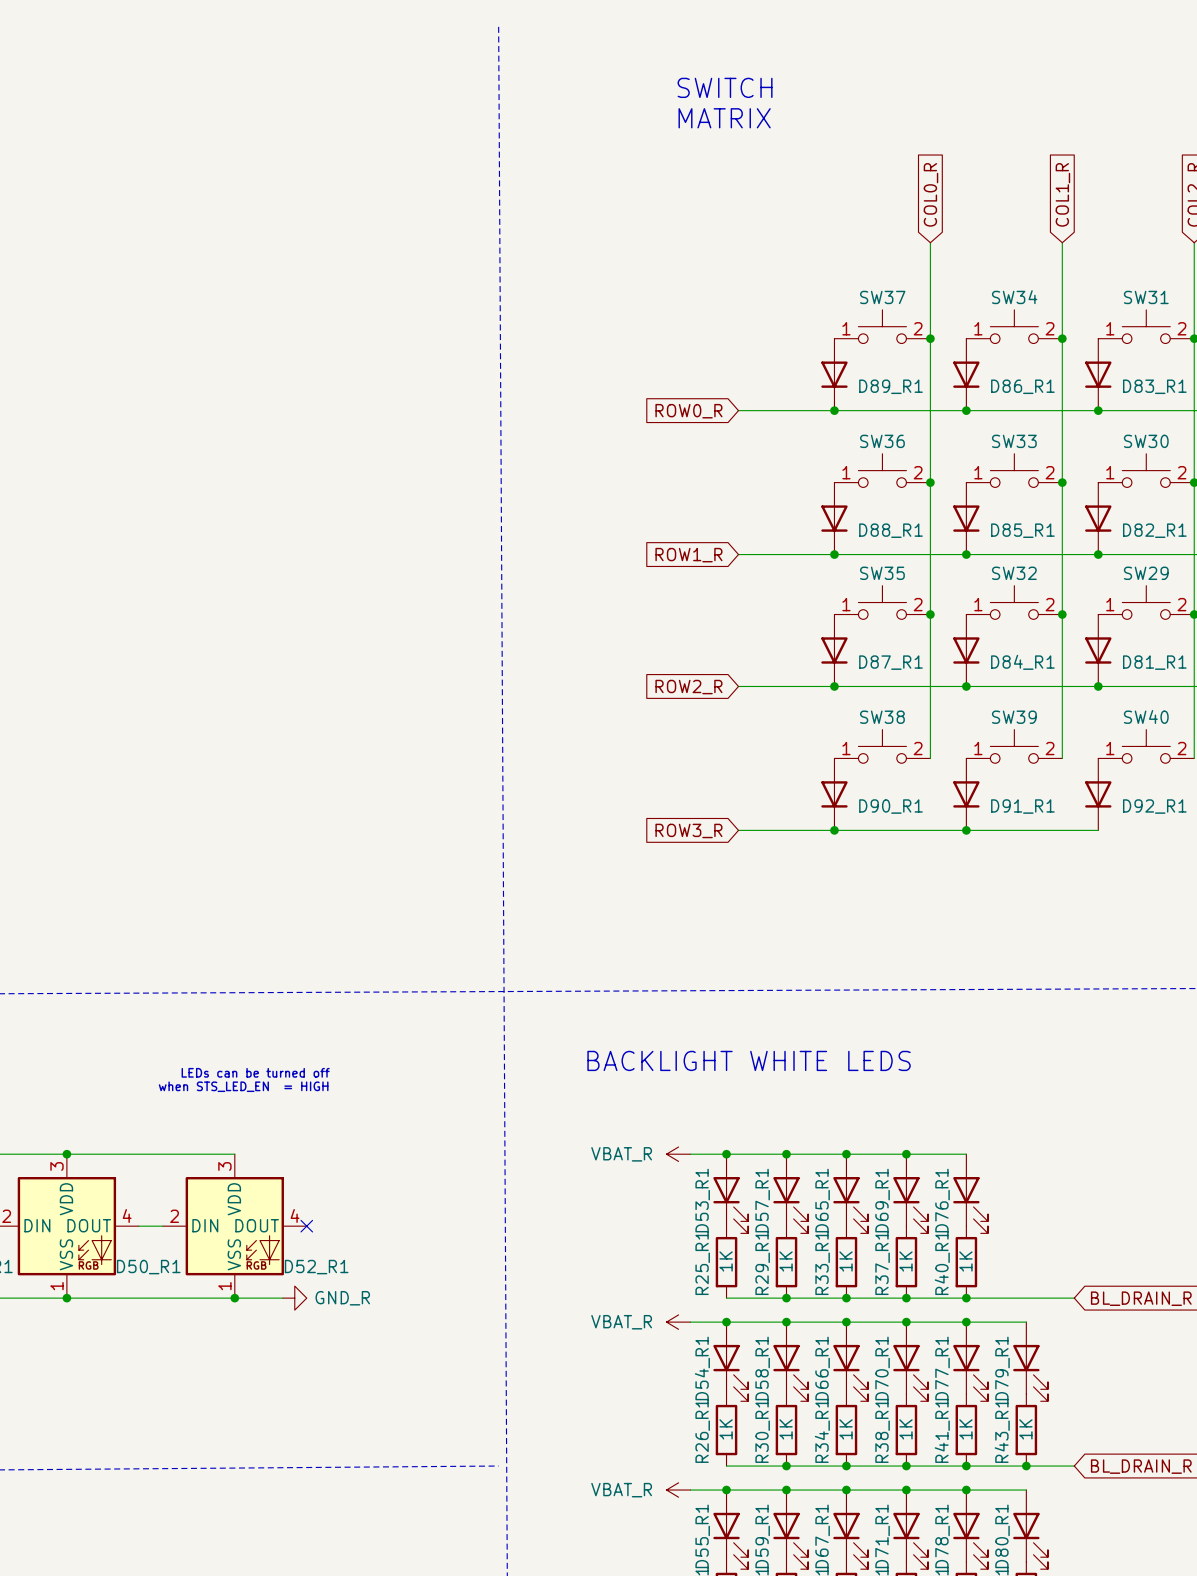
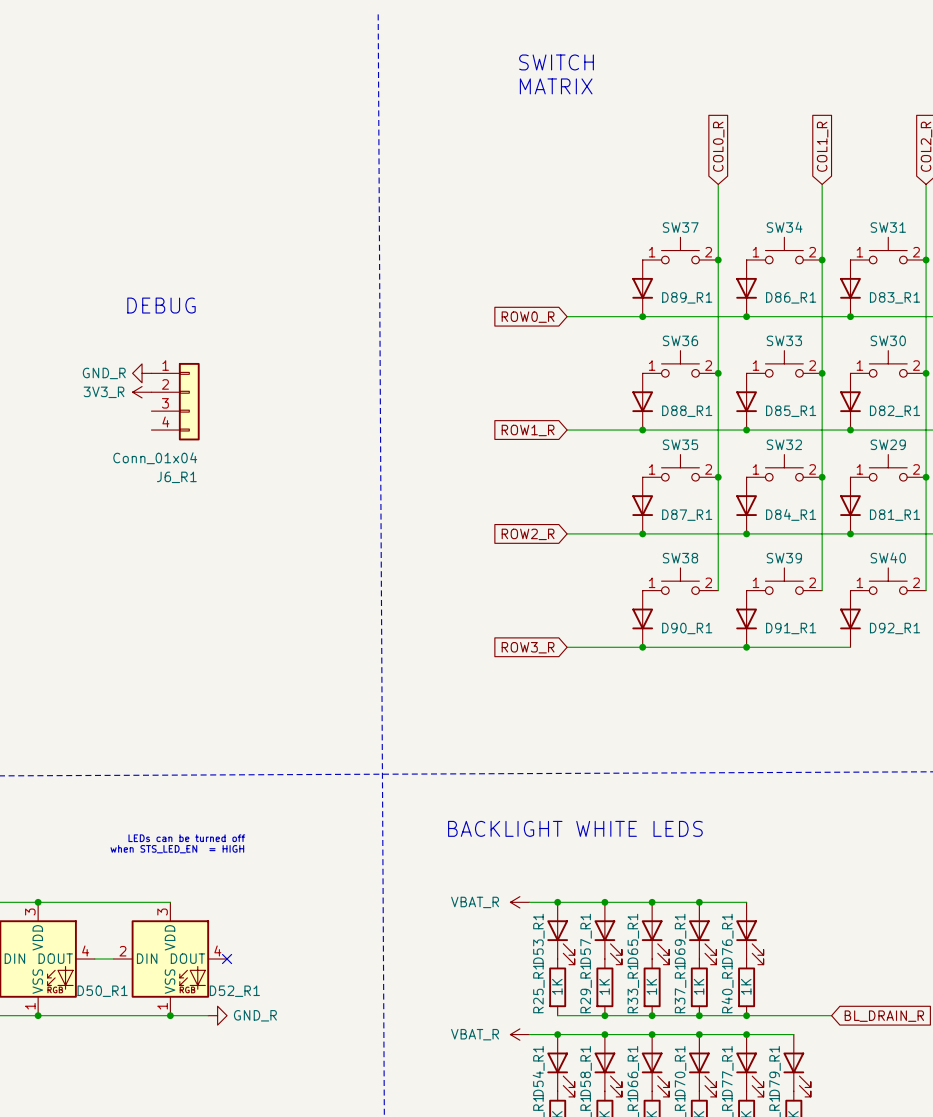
text: none -> DEBUG (161, 305)
power symbol: none -> GND_R (142, 373)
power symbol: none -> 3V3_R (142, 392)
J6_R1: none -> Conn_01x04 (175, 401)

